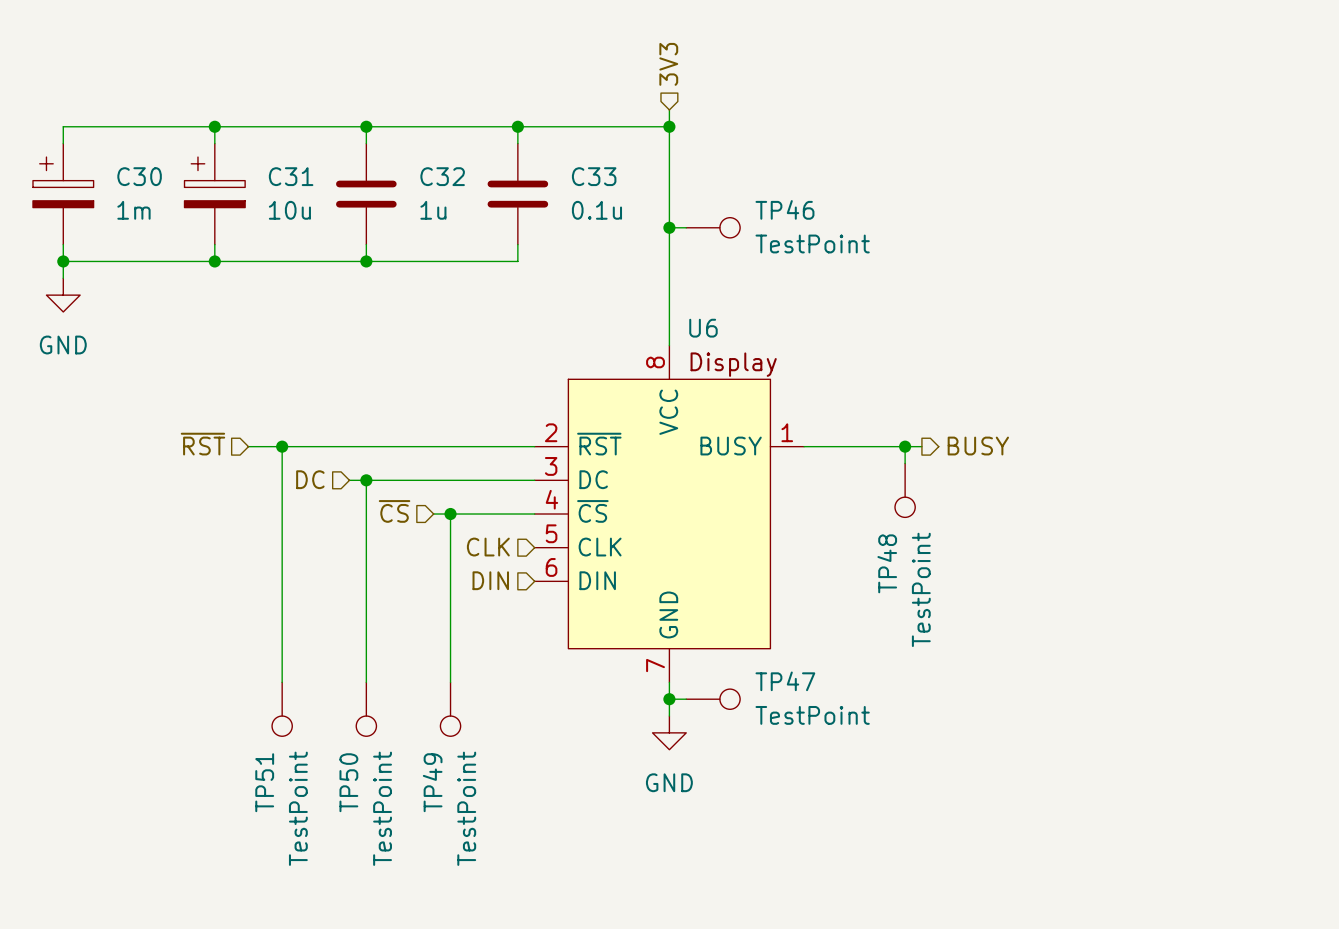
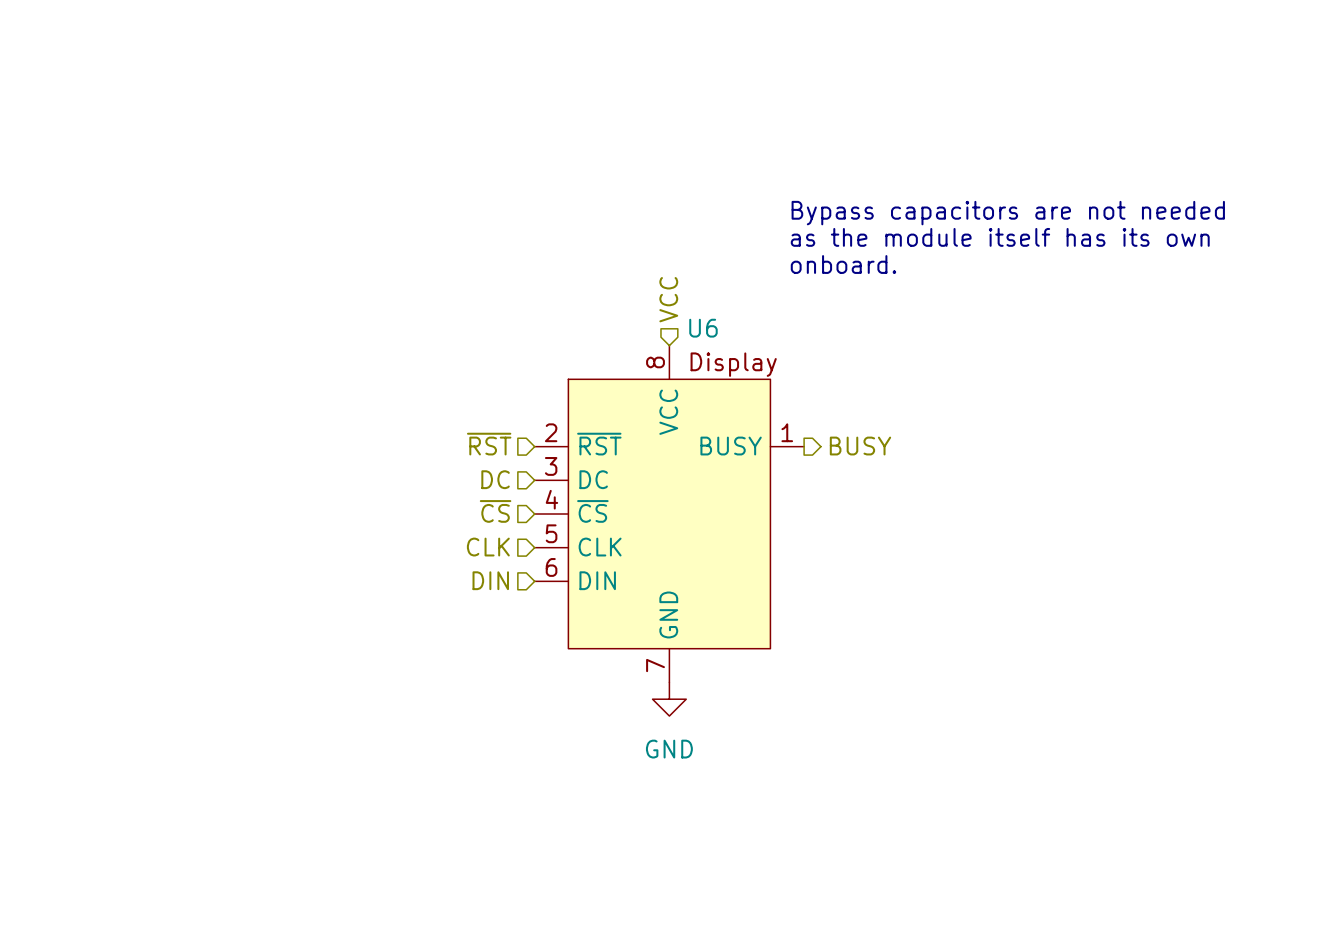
hierarchical label: 3V3 (668, 64) -> none
wire: (669, 109) (669, 345) -> none
wire: (214, 126) (214, 143) -> none
junction: (214, 126) -> none
wire: (366, 126) (366, 143) -> none
junction: (366, 126) -> none
wire: (517, 126) (517, 143) -> none
junction: (517, 126) -> none
wire: (669, 126) (63, 126) (63, 143) -> none
junction: (669, 126) -> none
C30: 1m (63, 194) -> none
C31: 10u (214, 194) -> none
C32: 1u (366, 194) -> none
C33: 0.1u (517, 194) -> none
text: none -> Bypass capacitors are not needed (1008, 213)
wire: (669, 227) (686, 227) -> none
junction: (669, 227) -> none
TP46: TestPoint (713, 227) -> none
text: none -> as the module itself has its own (1000, 237)
wire: (63, 244) (63, 278) -> none
wire: (214, 244) (214, 261) -> none
wire: (366, 244) (366, 261) -> none
wire: (517, 244) (517, 261) (63, 261) -> none
junction: (63, 261) -> none
junction: (214, 261) -> none
junction: (366, 261) -> none
text: none -> onboard. (843, 264)
power symbol: GND (63, 295) -> none
hierarchical label: none -> VCC (668, 299)
hierarchical label position: ~{RST} (202, 444) -> ~{RST} (489, 444)
wire: (248, 446) (534, 446) -> none
wire: (282, 446) (282, 682) -> none
junction: (282, 446) -> none
wire: (804, 446) (921, 446) -> none
wire: (905, 446) (905, 463) -> none
junction: (905, 446) -> none
hierarchical label position: BUSY (978, 446) -> BUSY (860, 446)
hierarchical label position: DC (310, 479) -> DC (495, 479)
wire: (349, 480) (534, 480) -> none
wire: (366, 480) (366, 682) -> none
junction: (366, 480) -> none
TP48: TestPoint (905, 490) -> none
hierarchical label position: ~{CS} (394, 511) -> ~{CS} (495, 511)
wire: (433, 514) (534, 514) -> none
wire: (450, 514) (450, 682) -> none
junction: (450, 514) -> none
junction: (669, 699) -> none
TP47: TestPoint (713, 699) -> none
TP51: TestPoint (282, 709) -> none
TP50: TestPoint (366, 709) -> none
TP49: TestPoint (450, 709) -> none
power symbol position: GND (669, 732) -> GND (669, 699)

